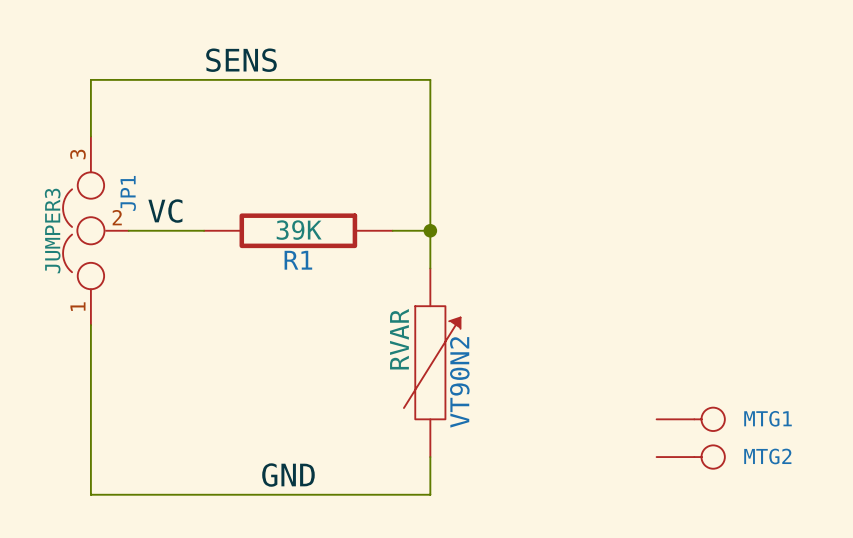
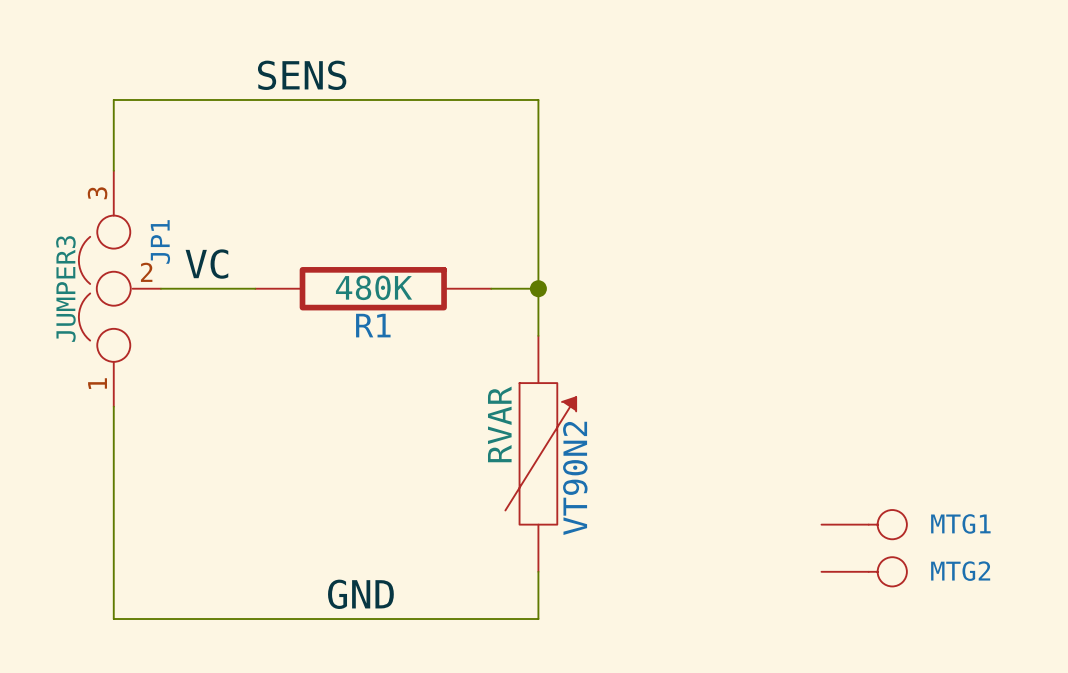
R1 value: 39K (299, 230) -> 480K (374, 287)

